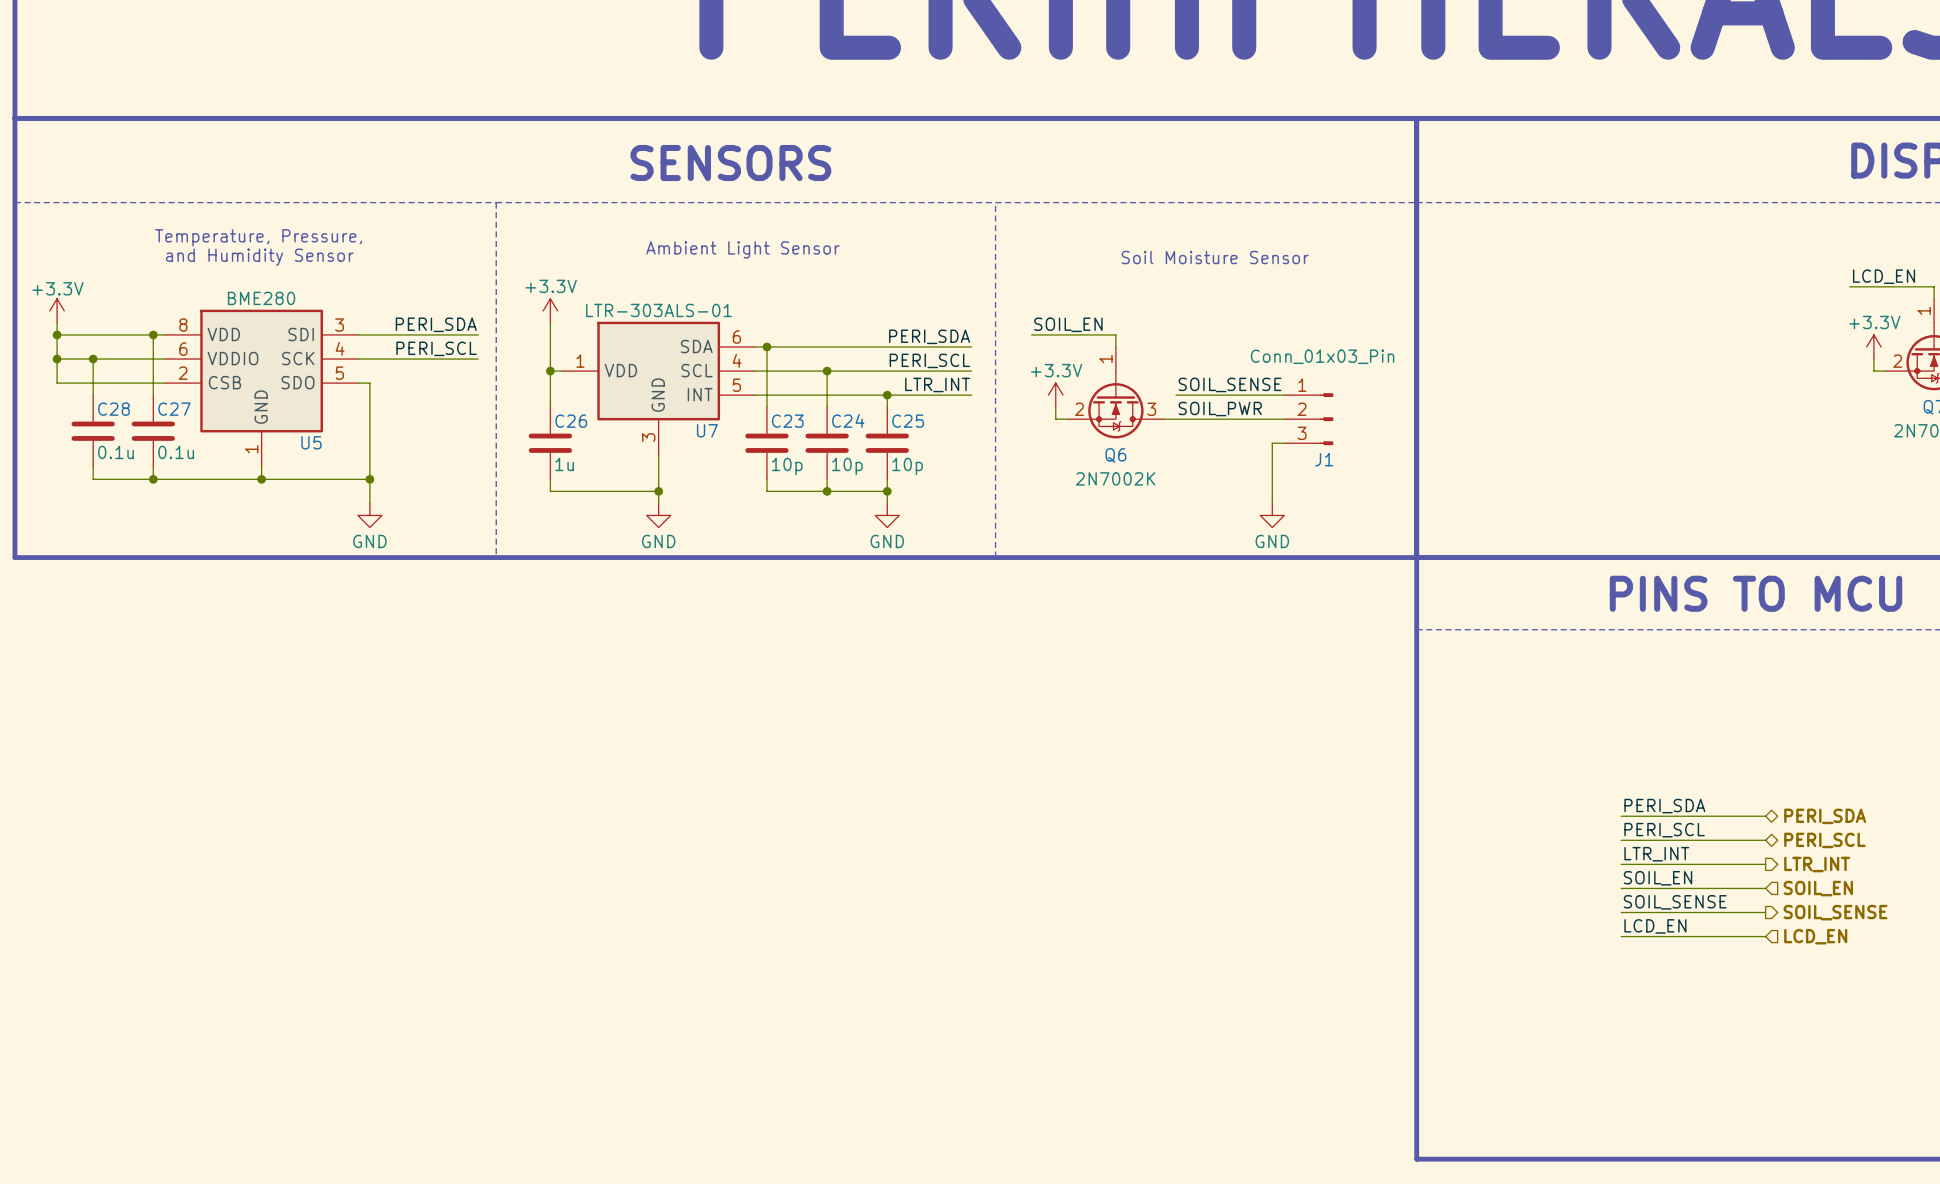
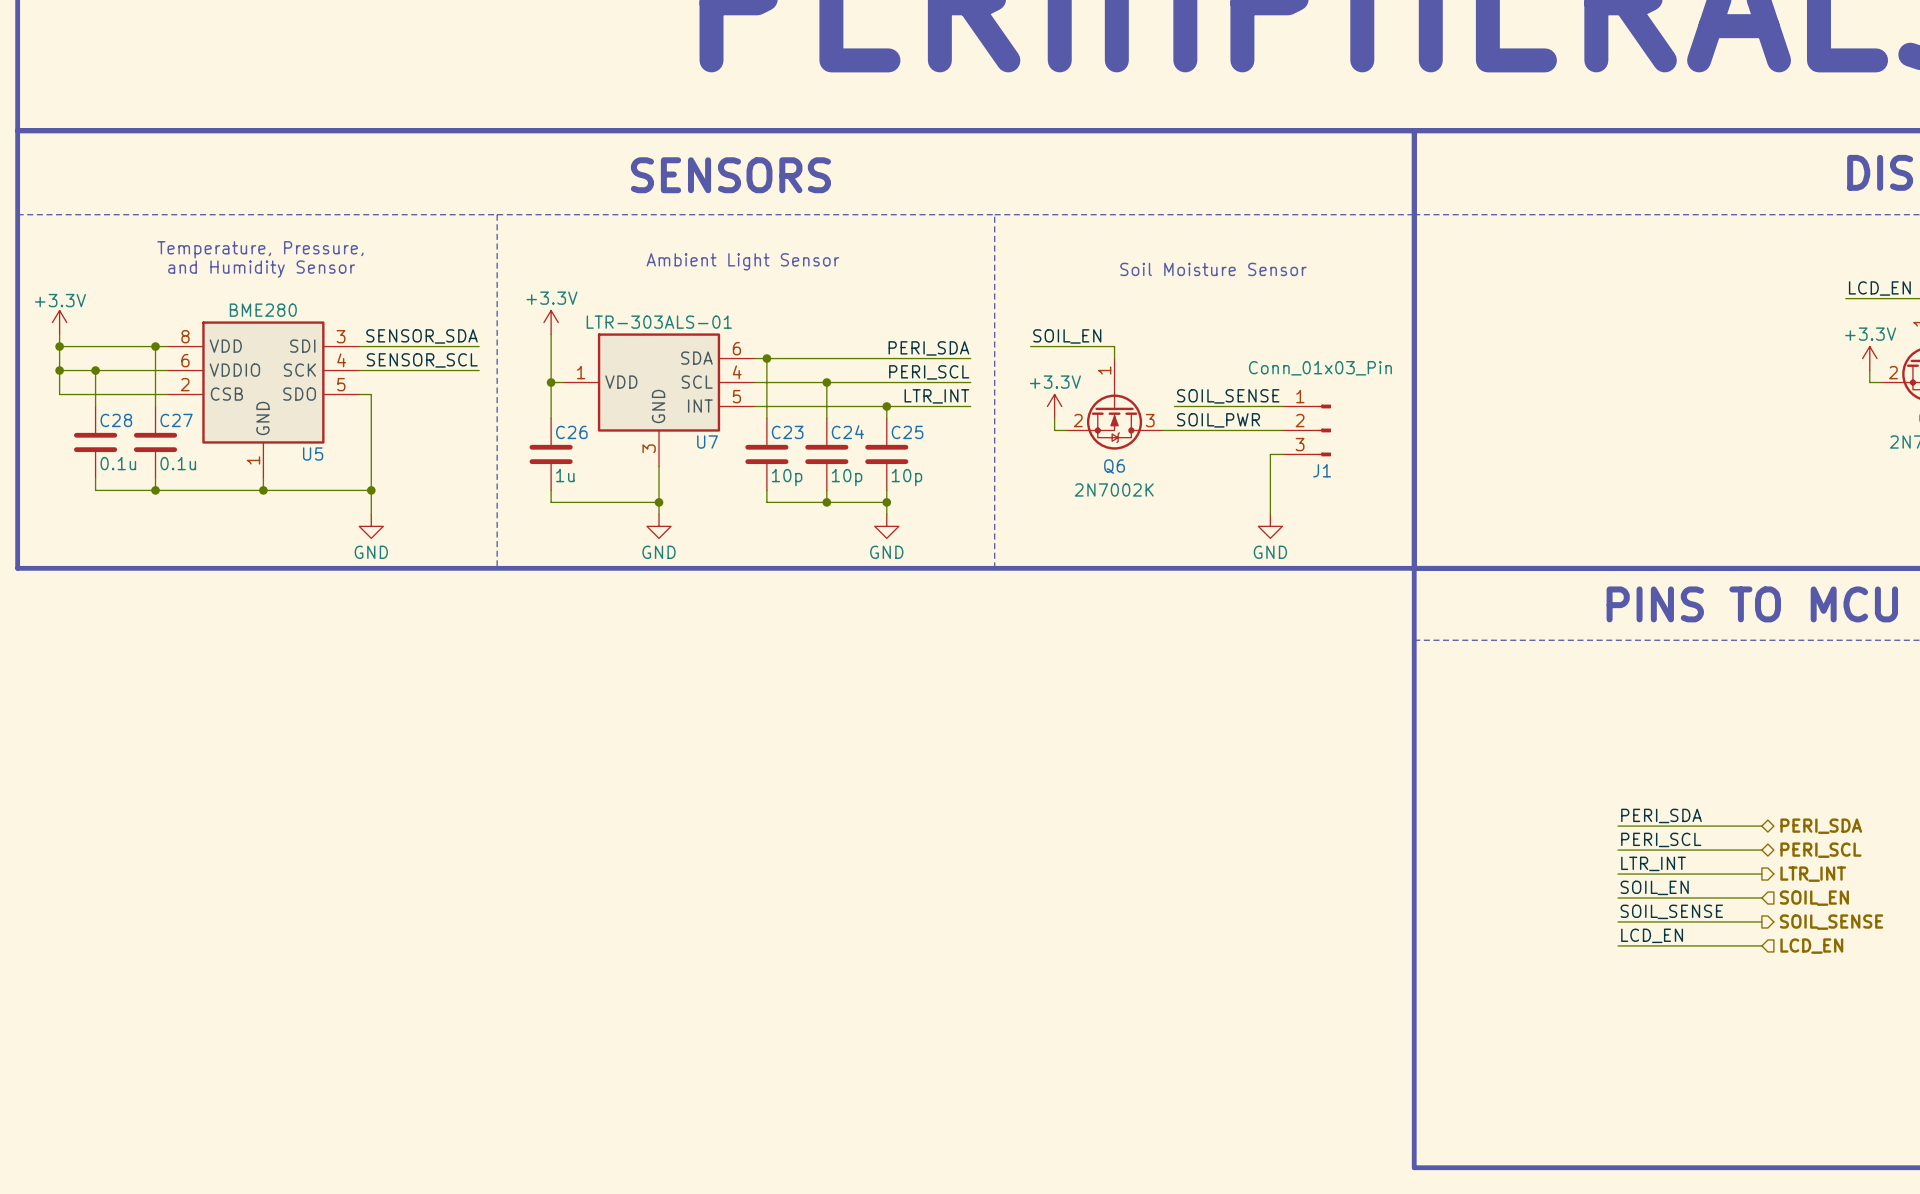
label: PERI_SDA (436, 324) -> SENSOR_SDA (422, 336)
label: PERI_SCL (436, 348) -> SENSOR_SCL (422, 360)

